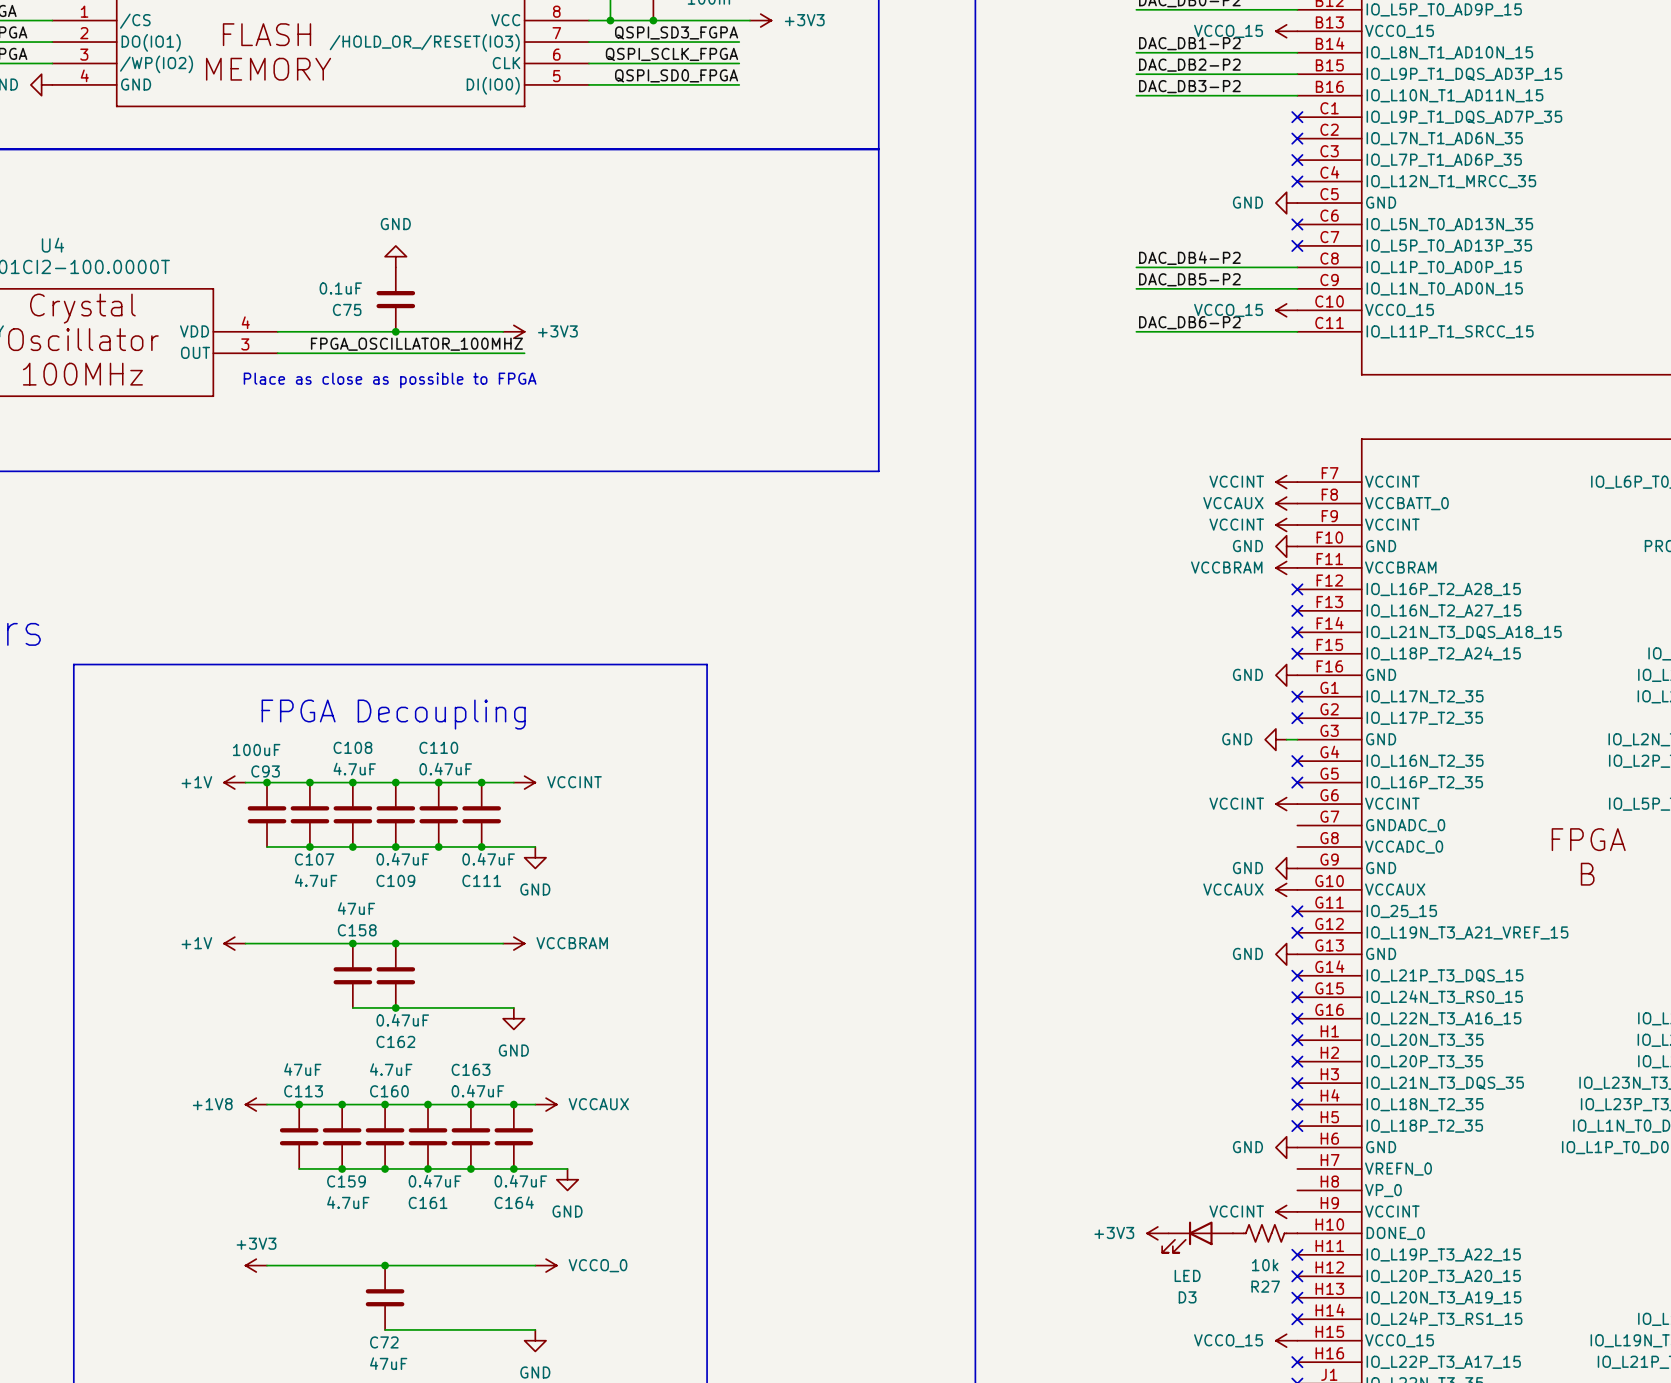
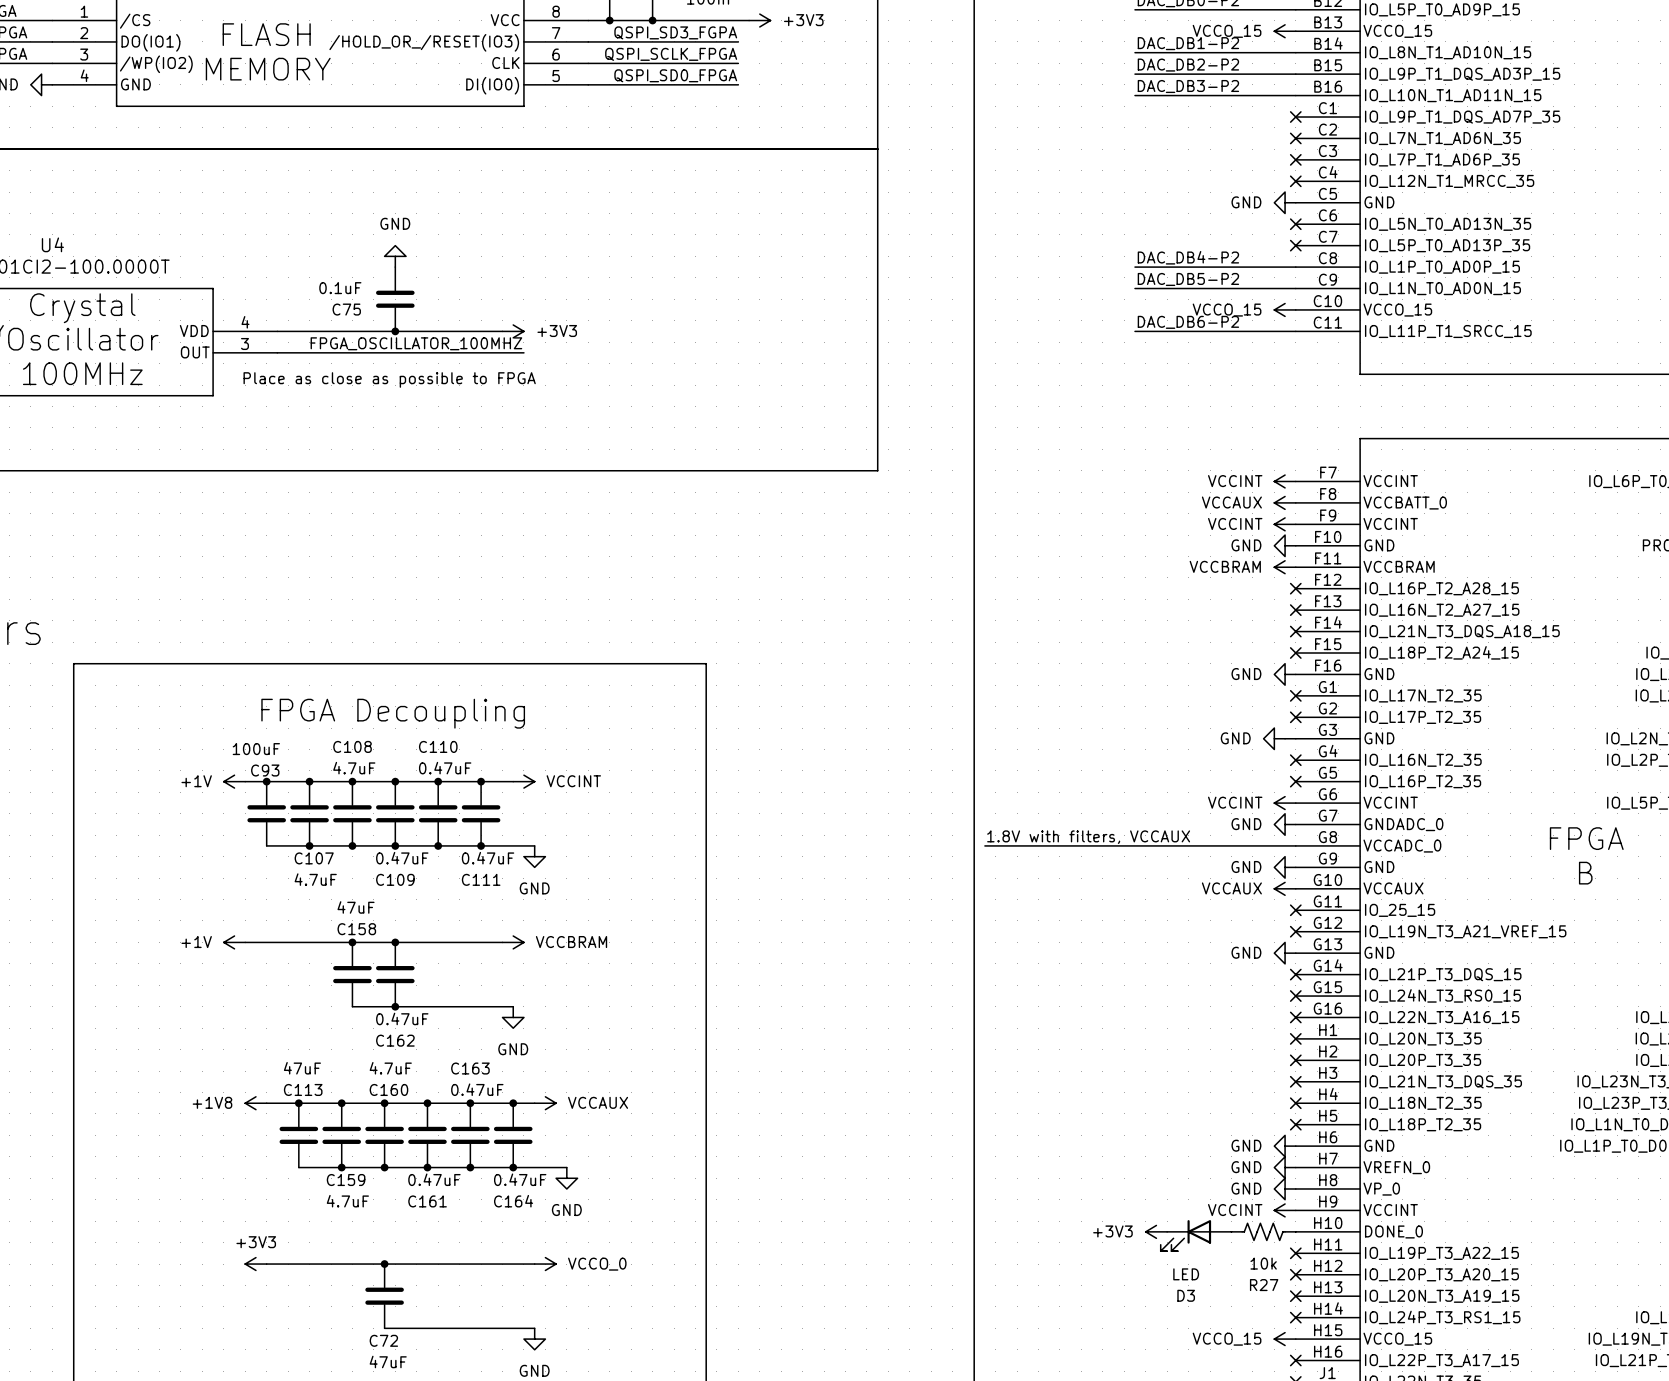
power symbol: none -> GND (1285, 824)
label: none -> 1.8V with filters, VCCAUX (1088, 837)
wire: none -> (984, 845) (1295, 845)
power symbol: none -> GND (1285, 1167)
power symbol: none -> GND (1285, 1188)

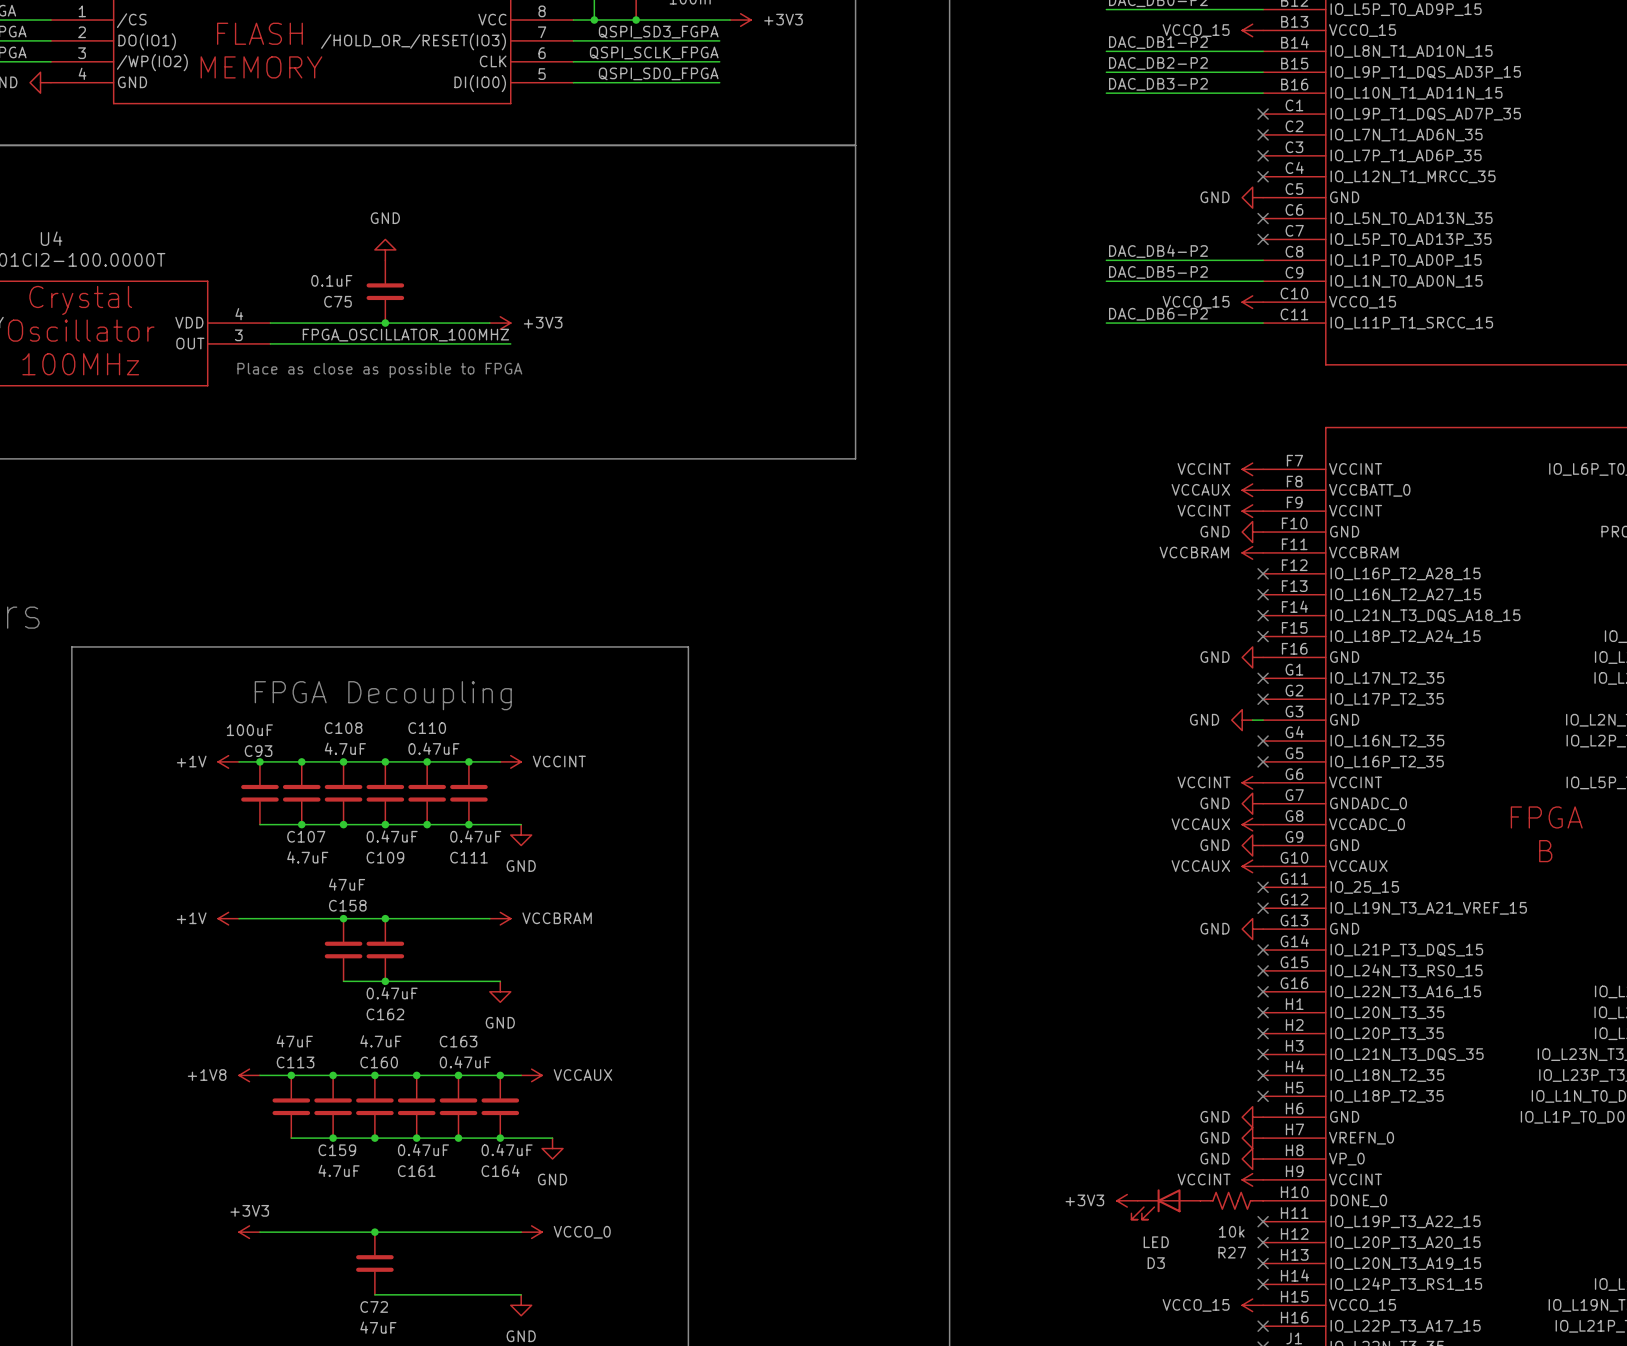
label: 1.8V with filters, VCCAUX (1088, 837) -> none
wire: (984, 845) (1295, 845) -> none
power symbol: none -> VCCAUX (1252, 824)

